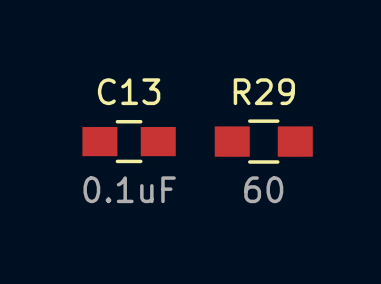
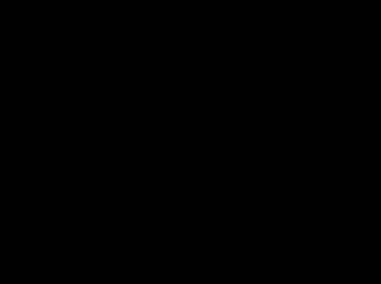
C13: 0.1uF (129, 141) -> none
R29: 60 (263, 141) -> none

